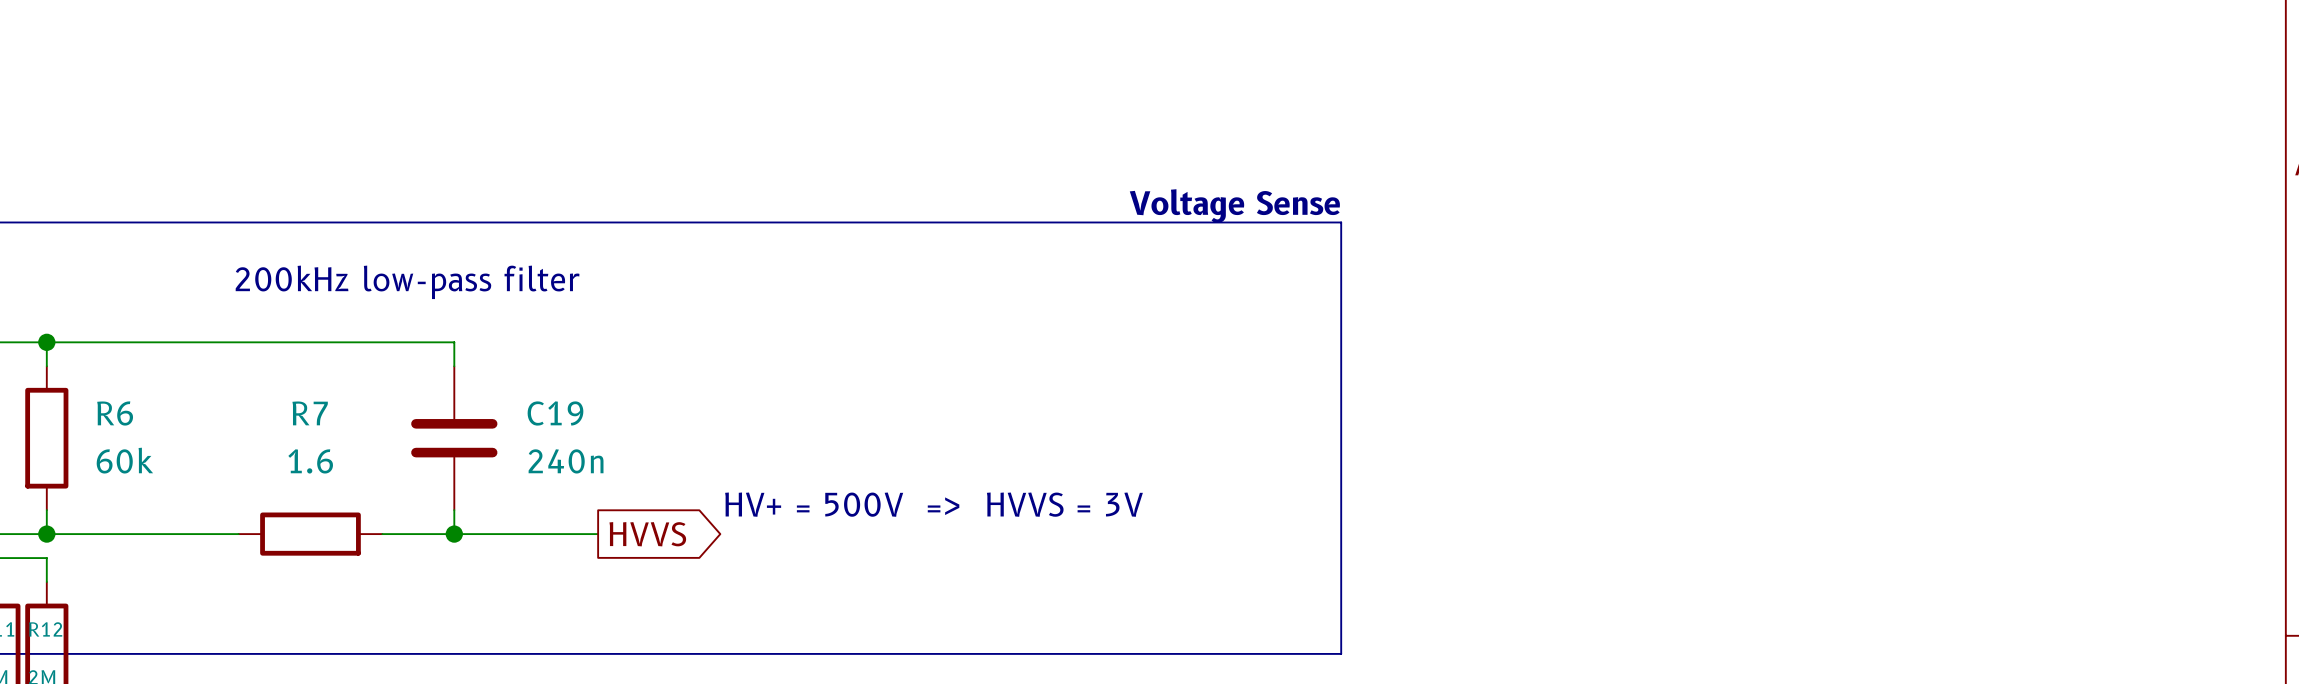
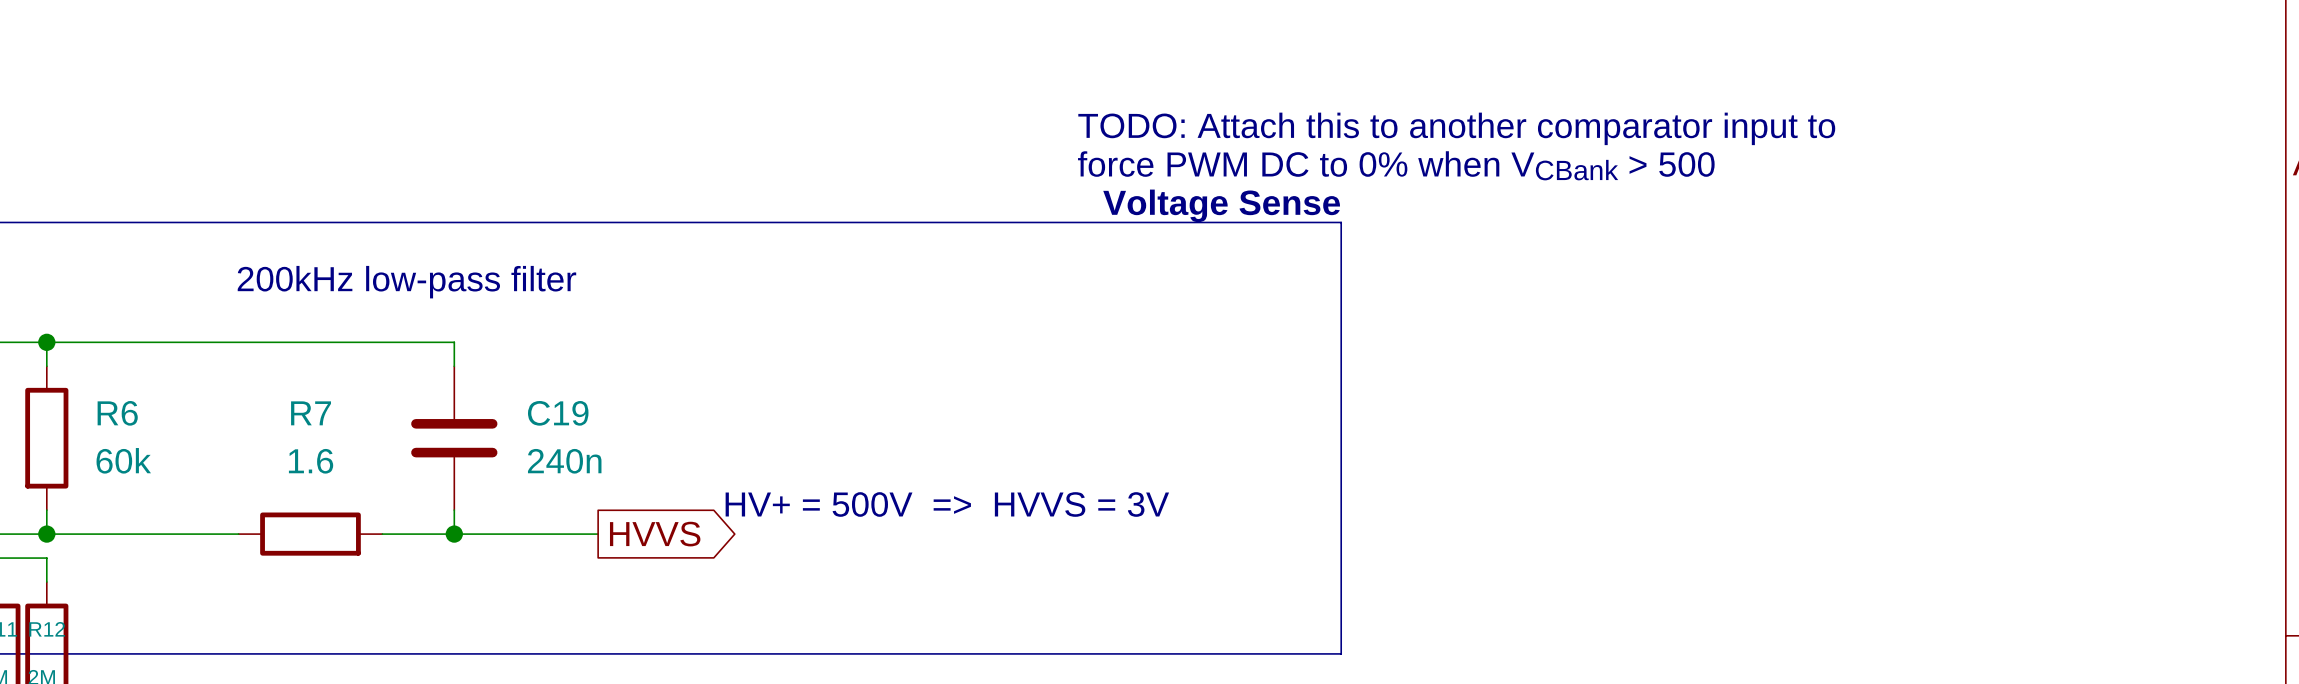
text: none -> TODO: Attach this to another comparator input to (1456, 128)
text: none -> force PWM DC to 0% when VCBank > 500 (1396, 165)

